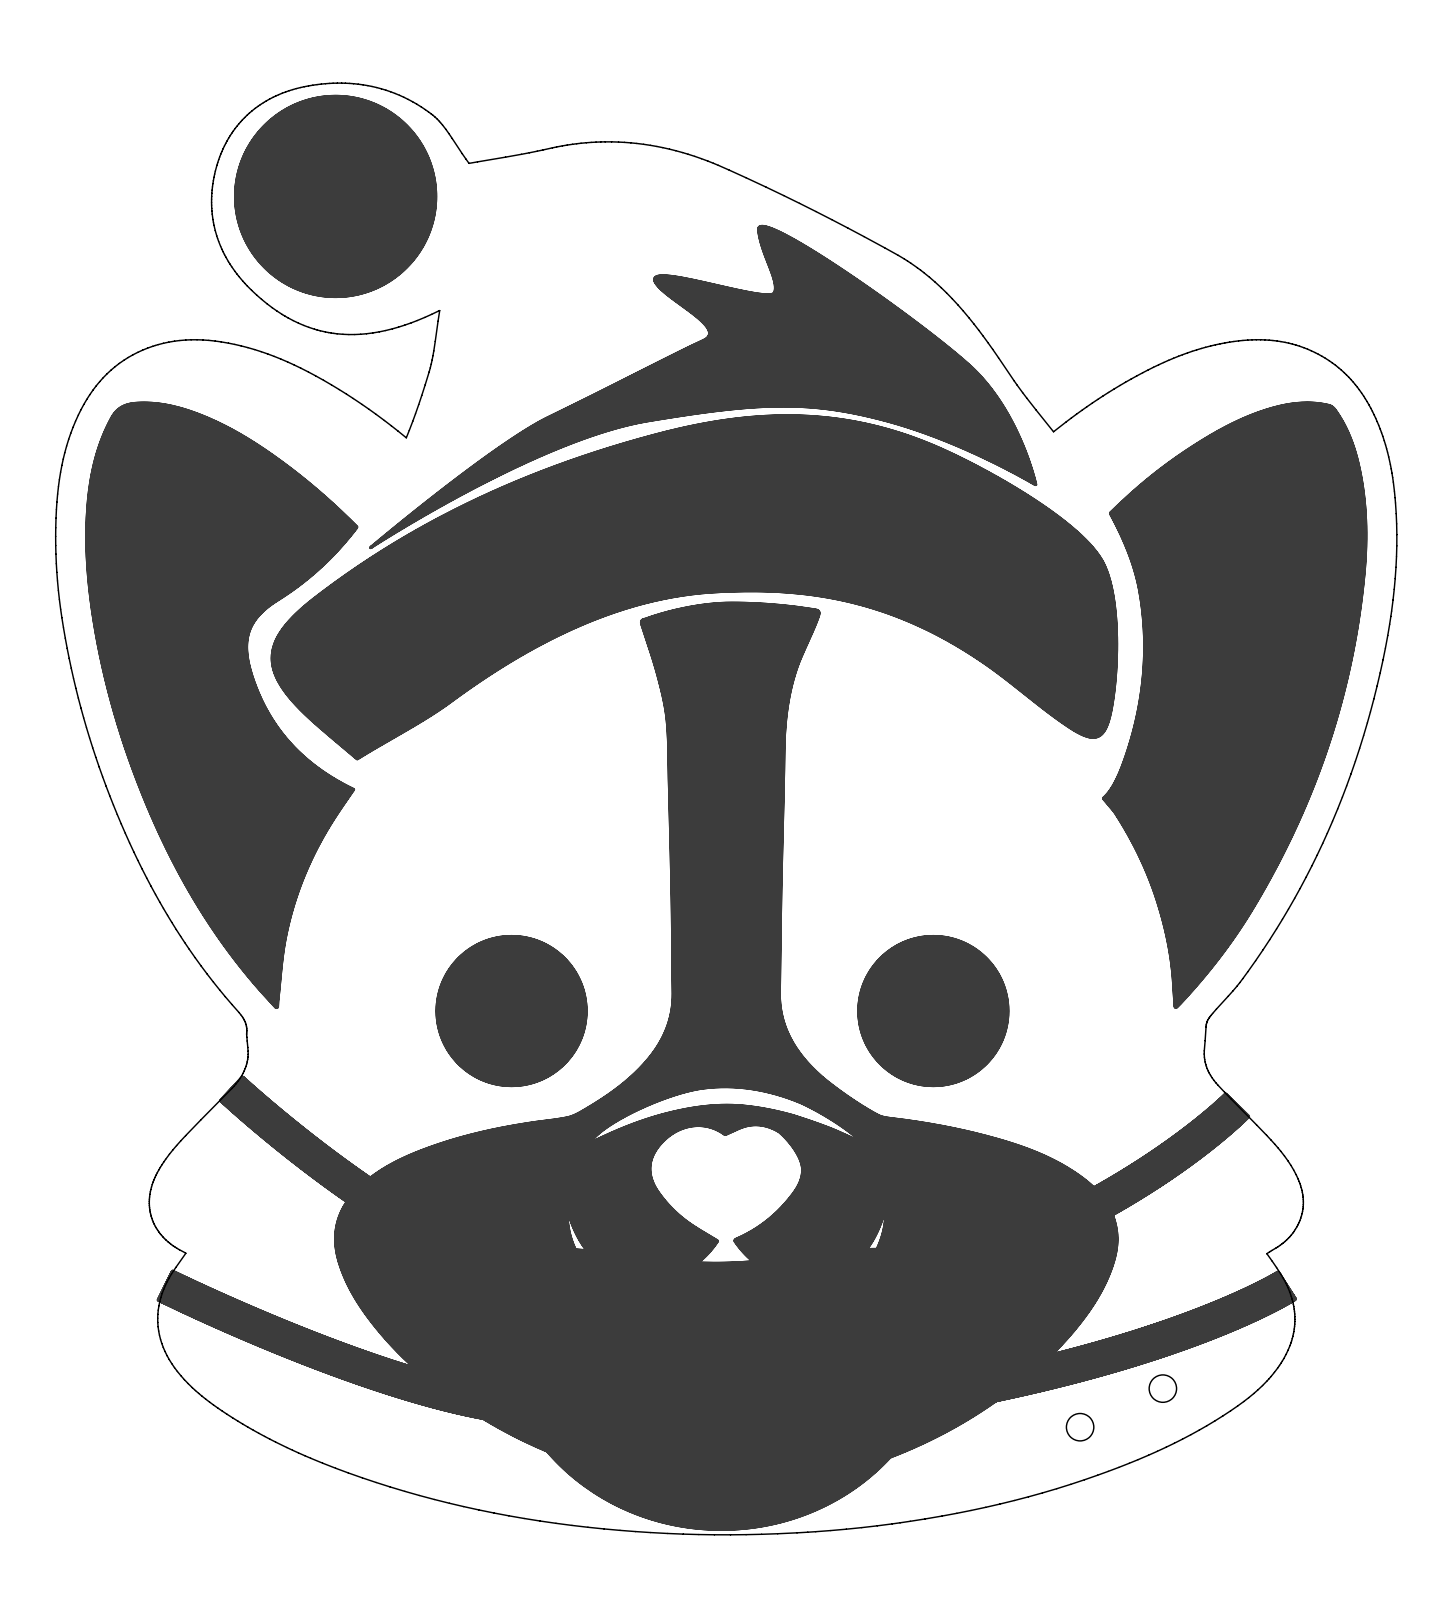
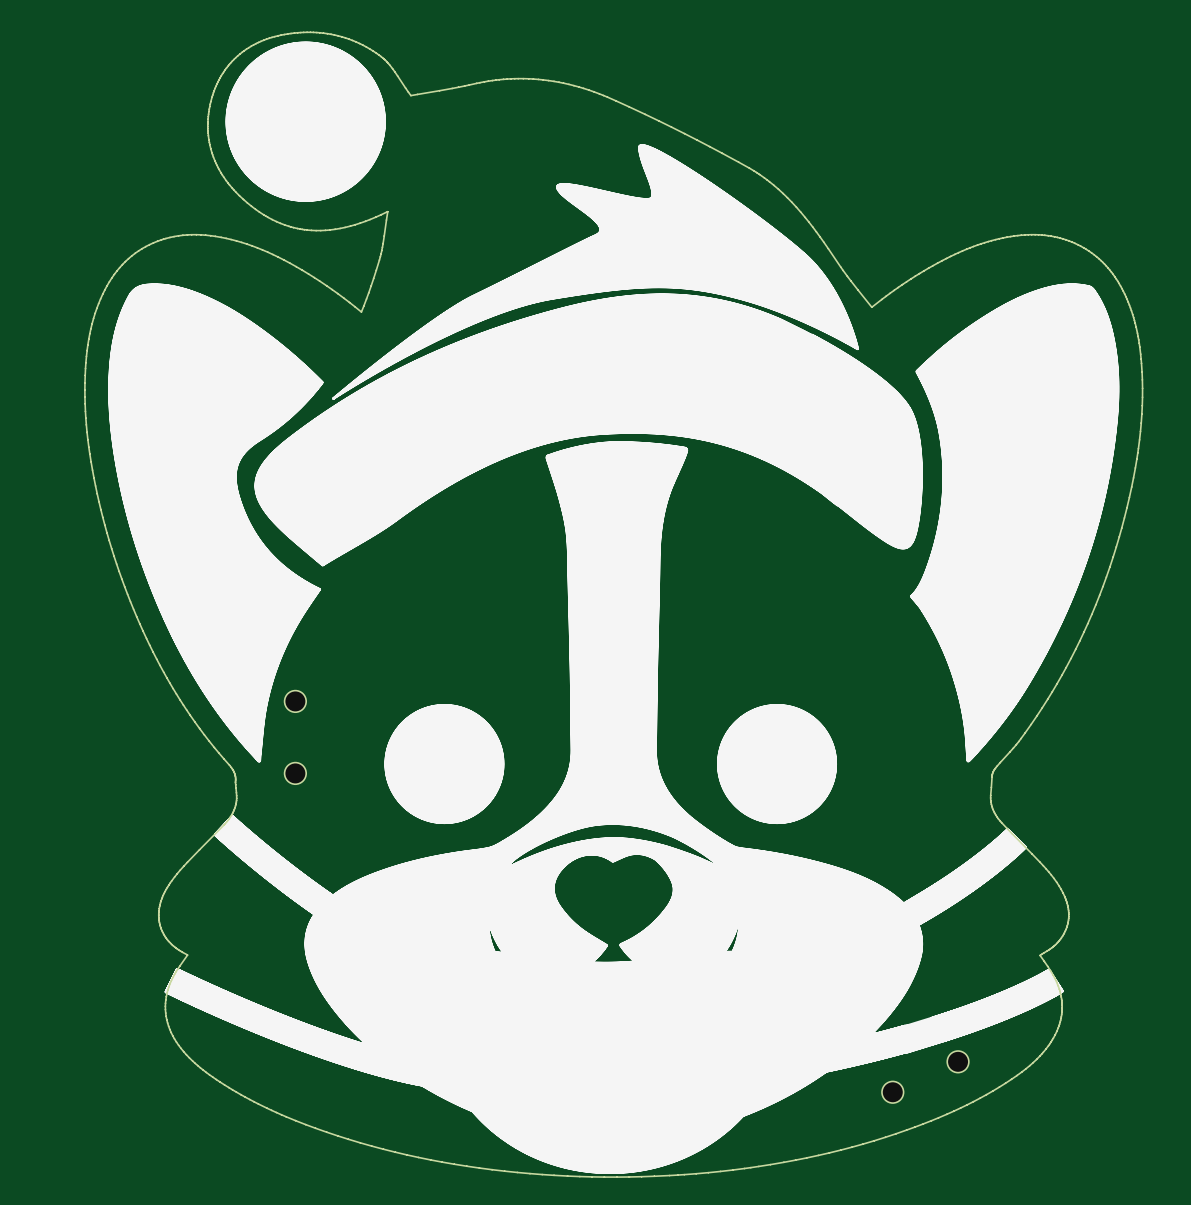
drawing: none -> [164, 283, 1120, 1142]
drawing: [270, 414, 1297, 1490] -> none
part: none -> (295, 737)

